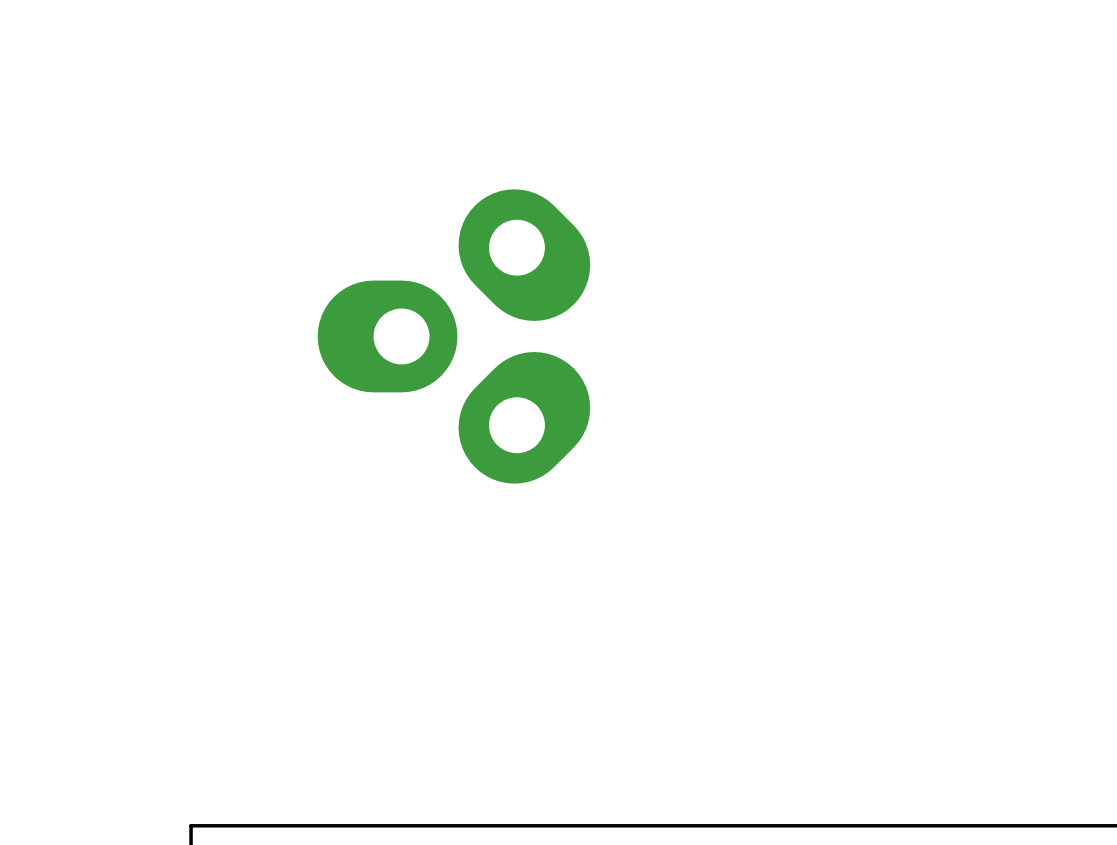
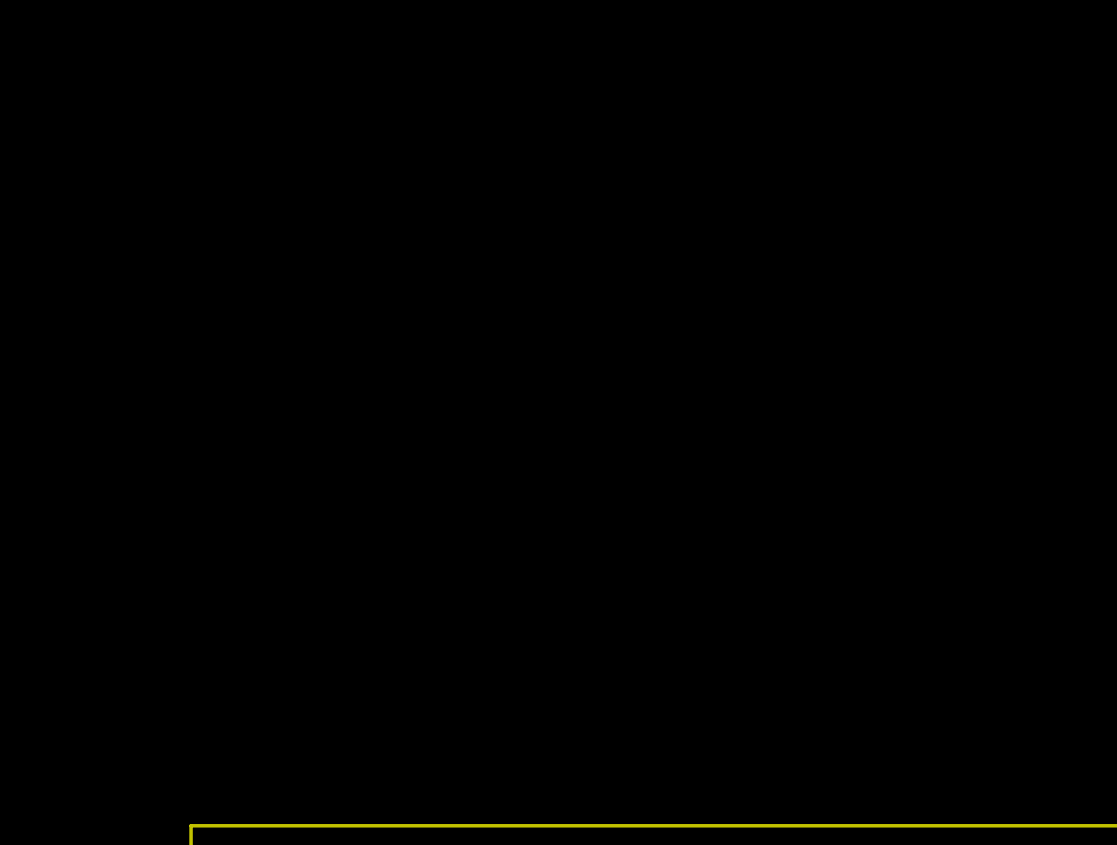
part: (453, 336) -> none

